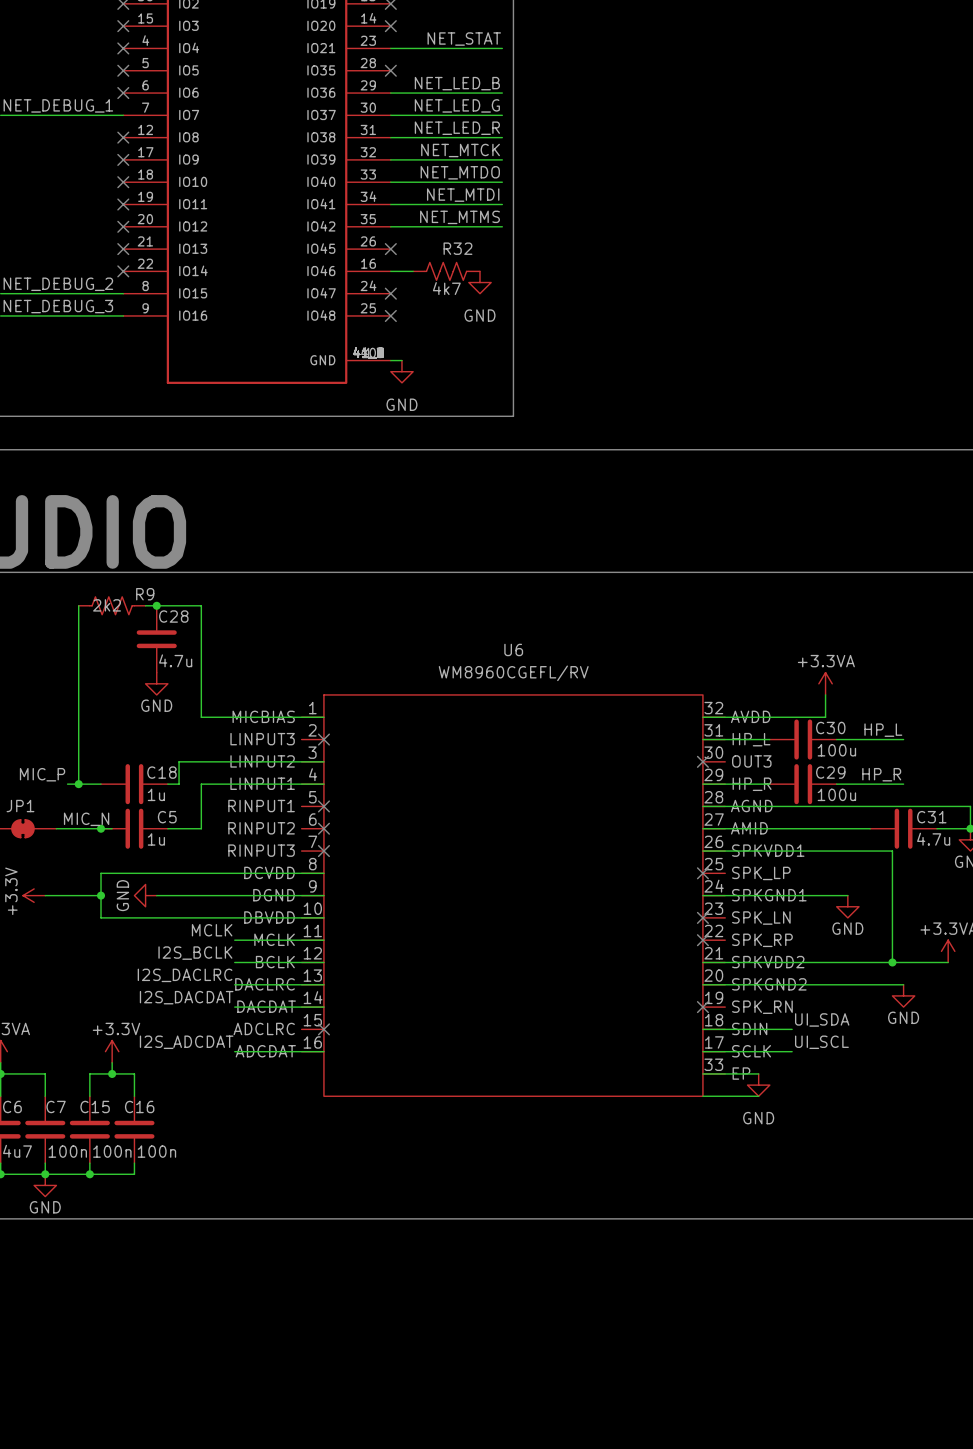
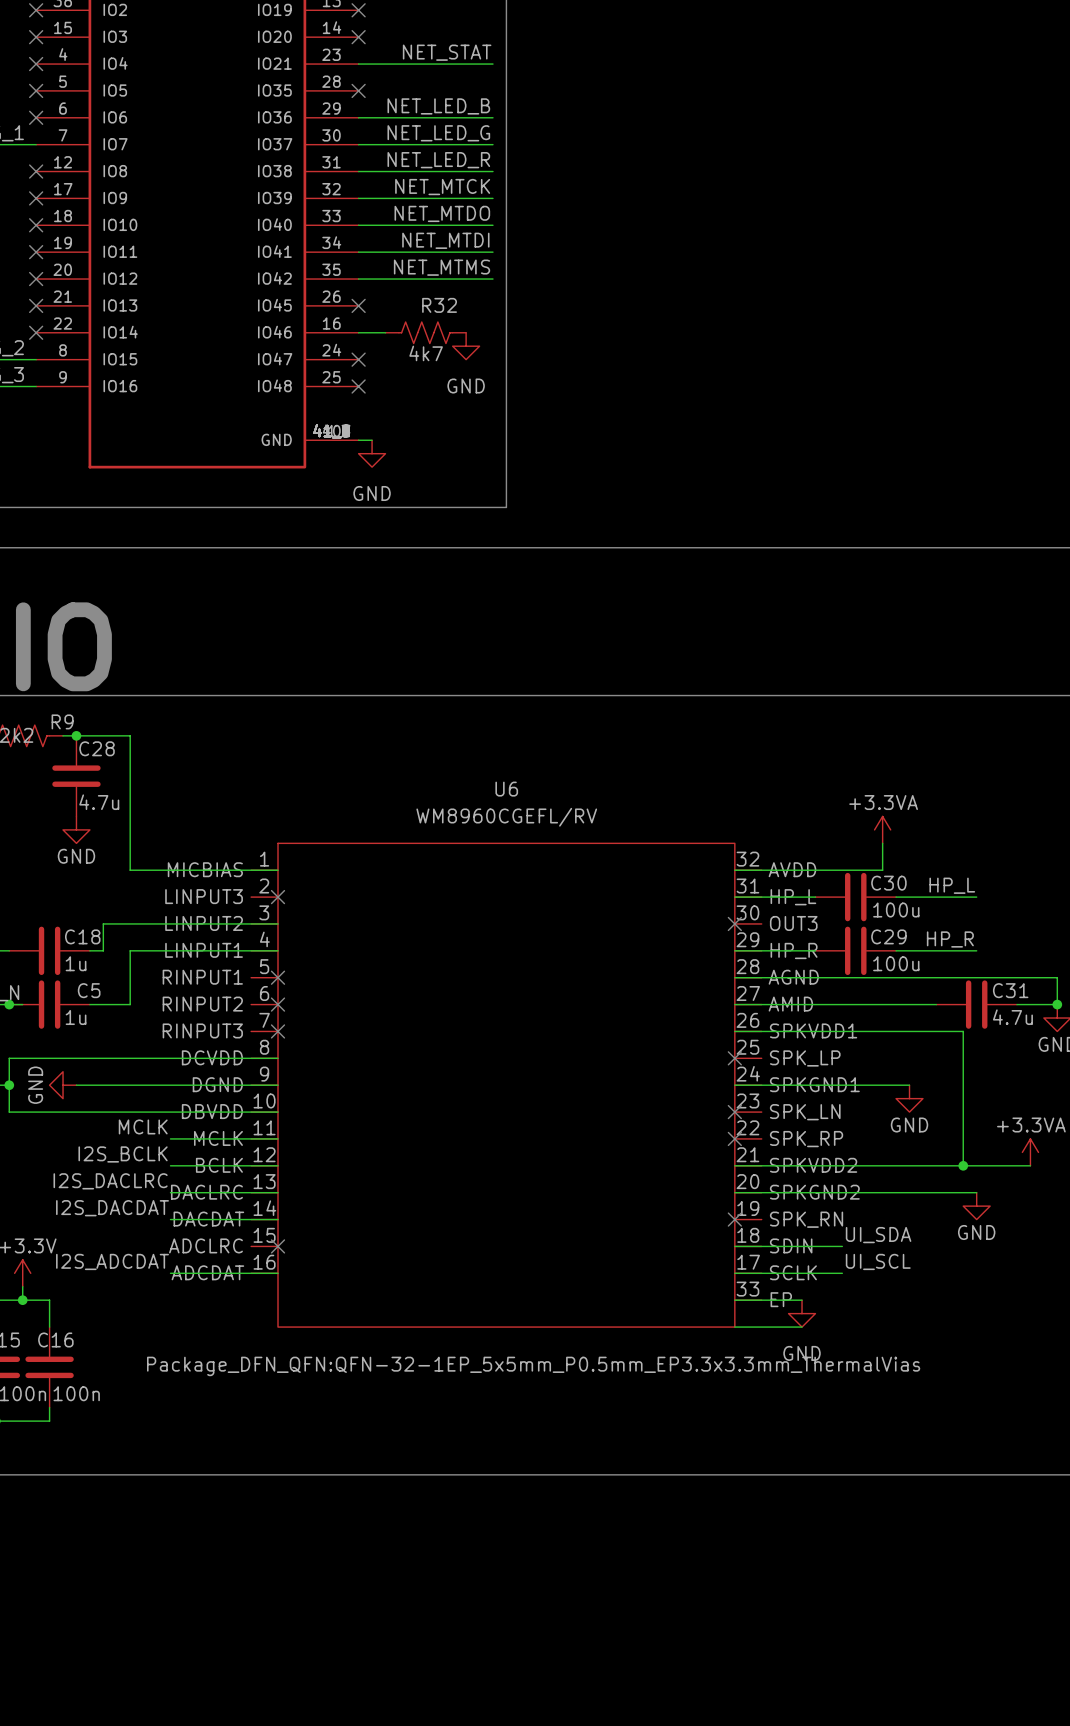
U6 text: none -> Package_DFN_QFN:QFN-32-1EP_5x5mm_P0.5mm_EP3.3x3.3mm_ThermalVias (533, 1366)

